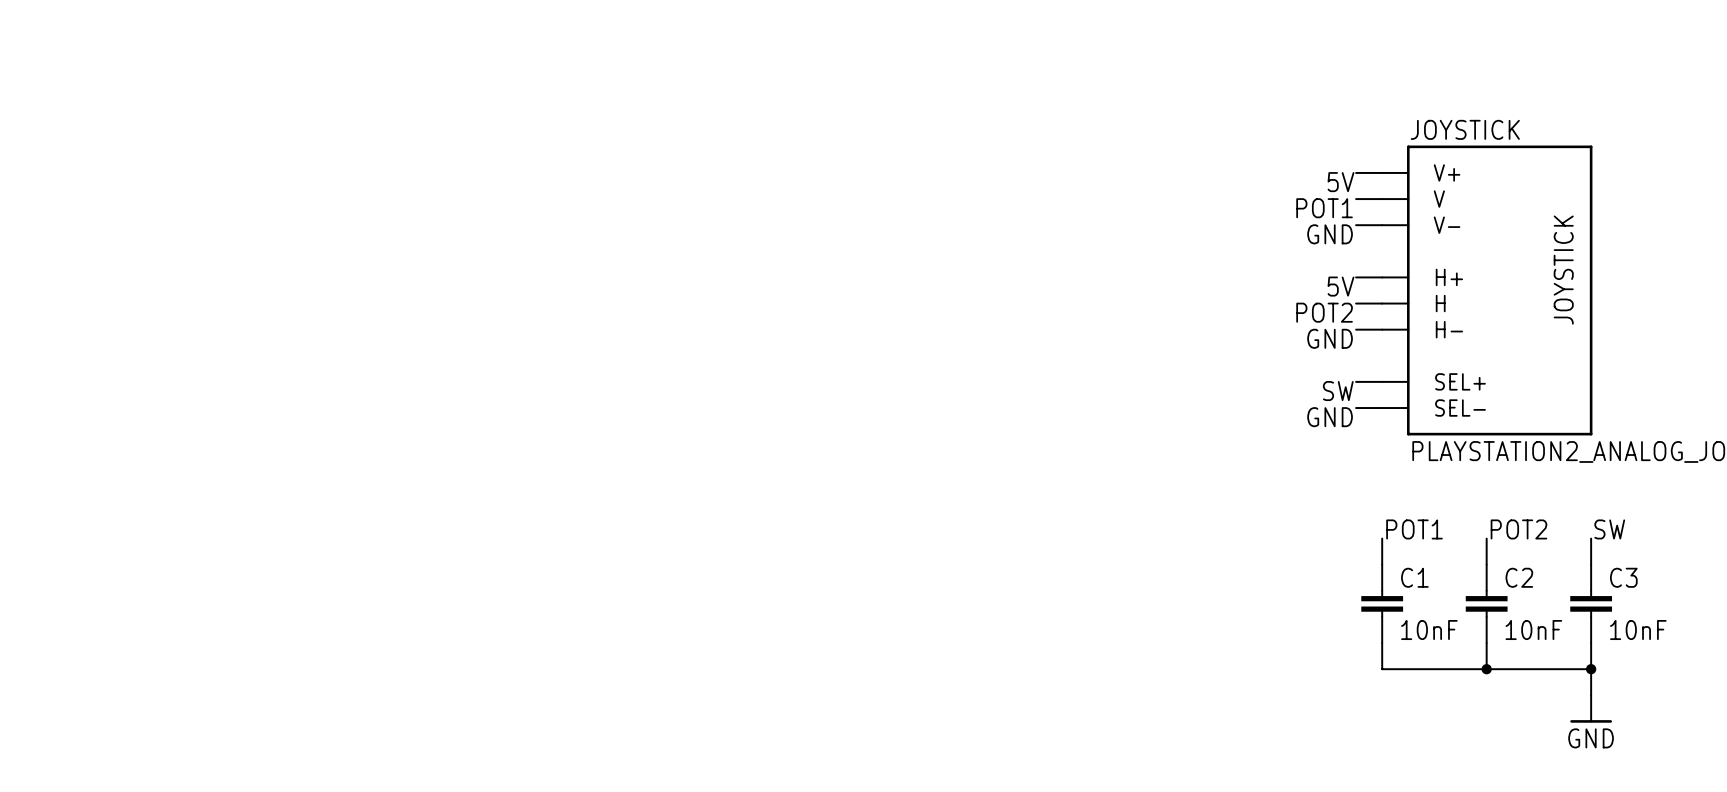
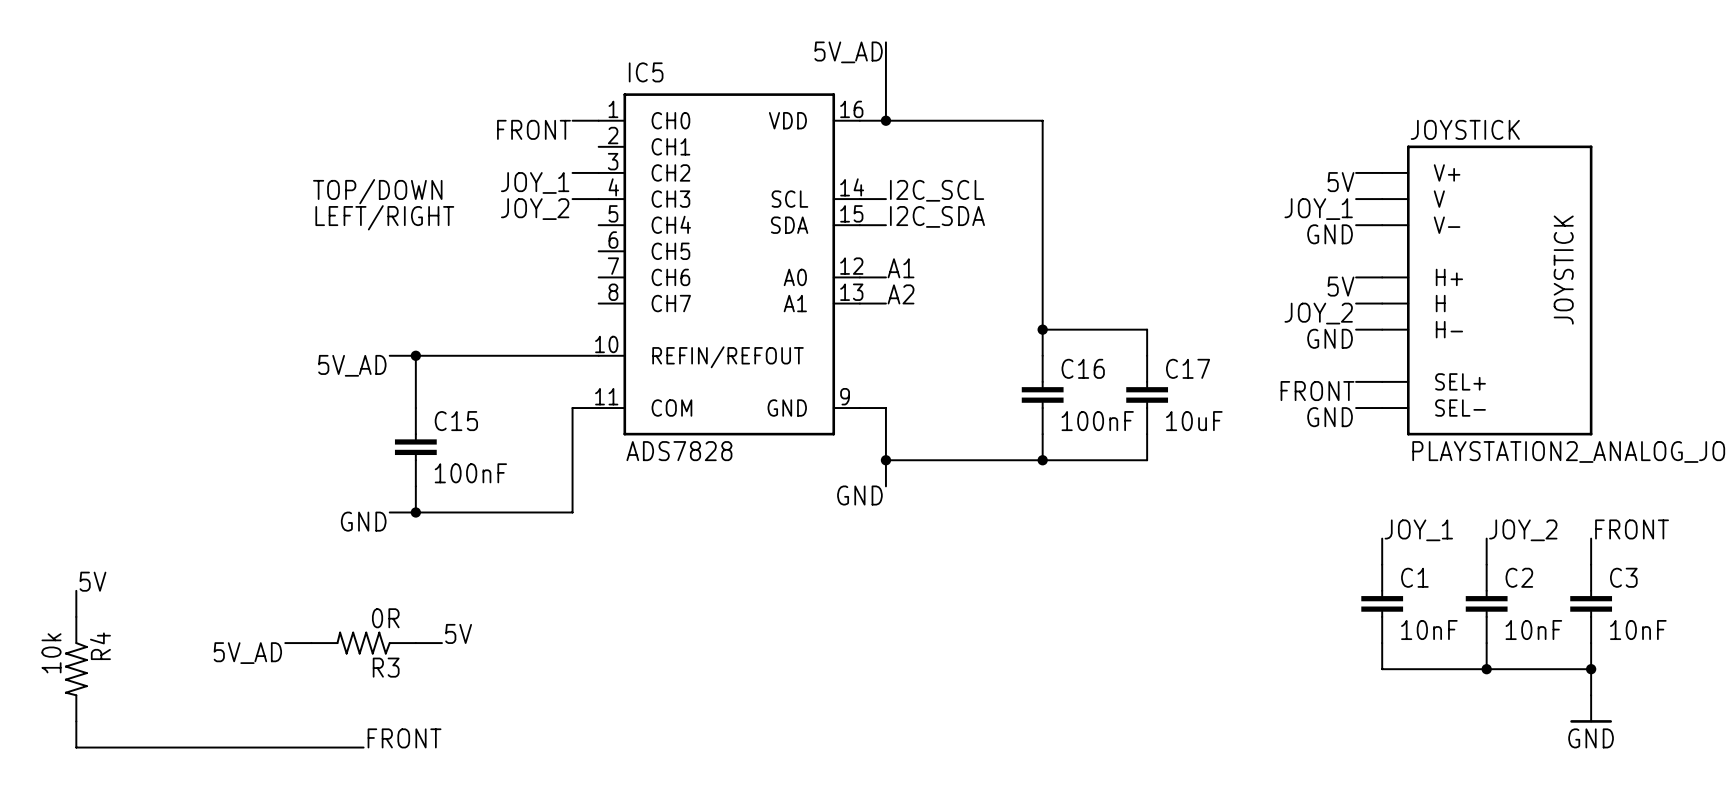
wire: none -> (885, 42) (885, 120)
label: none -> 5V_AD (848, 52)
wire: none -> (572, 120) (598, 120)
wire: none -> (859, 120) (1042, 120) (1042, 355)
junction: none -> (885, 120)
label: none -> FRONT (533, 129)
wire: none -> (572, 172) (598, 172)
label: none -> JOY_1 (535, 182)
label: none -> I2C_SCL (937, 190)
text: none -> TOP/DOWN (377, 191)
wire: none -> (572, 199) (598, 199)
wire: none -> (859, 199) (885, 199)
label: POT1 (1324, 208) -> JOY_1 (1318, 209)
label: none -> JOY_2 (535, 209)
label: none -> I2C_SDA (937, 216)
text: none -> LEFT/RIGHT (384, 217)
wire: none -> (859, 225) (885, 225)
IC5: none -> ADS7828 (729, 264)
label: none -> A1 (901, 268)
wire: none -> (859, 277) (885, 277)
label: none -> A2 (901, 294)
wire: none -> (859, 303) (885, 303)
label: POT2 (1324, 312) -> JOY_2 (1318, 313)
wire: none -> (1042, 329) (1147, 329) (1147, 355)
junction: none -> (1042, 329)
wire: none -> (389, 355) (598, 355)
wire: none -> (415, 355) (415, 408)
junction: none -> (415, 355)
label: none -> 5V_AD (352, 365)
label: SW (1338, 391) -> FRONT (1317, 391)
C16: none -> 100nF (1042, 394)
C17: none -> 10uF (1147, 394)
wire: none -> (598, 408) (572, 408) (572, 512) (389, 512)
wire: none -> (859, 408) (885, 408) (885, 486)
wire: none -> (1042, 434) (1042, 460)
wire: none -> (1147, 434) (1147, 460) (885, 460)
C15: none -> 100nF (415, 447)
junction: none -> (885, 460)
junction: none -> (1042, 460)
wire: none -> (415, 486) (415, 512)
label: none -> GND (859, 495)
junction: none -> (415, 512)
label: none -> GND (363, 521)
label: POT1 (1414, 529) -> JOY_1 (1418, 530)
label: POT2 (1518, 529) -> JOY_2 (1523, 530)
label: SW (1609, 529) -> FRONT (1632, 529)
label: none -> 5V (92, 581)
wire: none -> (76, 590) (76, 616)
label: none -> 5V (458, 633)
wire: none -> (285, 643) (311, 643)
R3: none -> 0R (363, 643)
wire: none -> (415, 643) (441, 643)
label: none -> 5V_AD (247, 653)
R4: none -> 10k (76, 669)
wire: none -> (76, 721) (76, 747) (363, 747)
label: none -> FRONT (404, 738)

